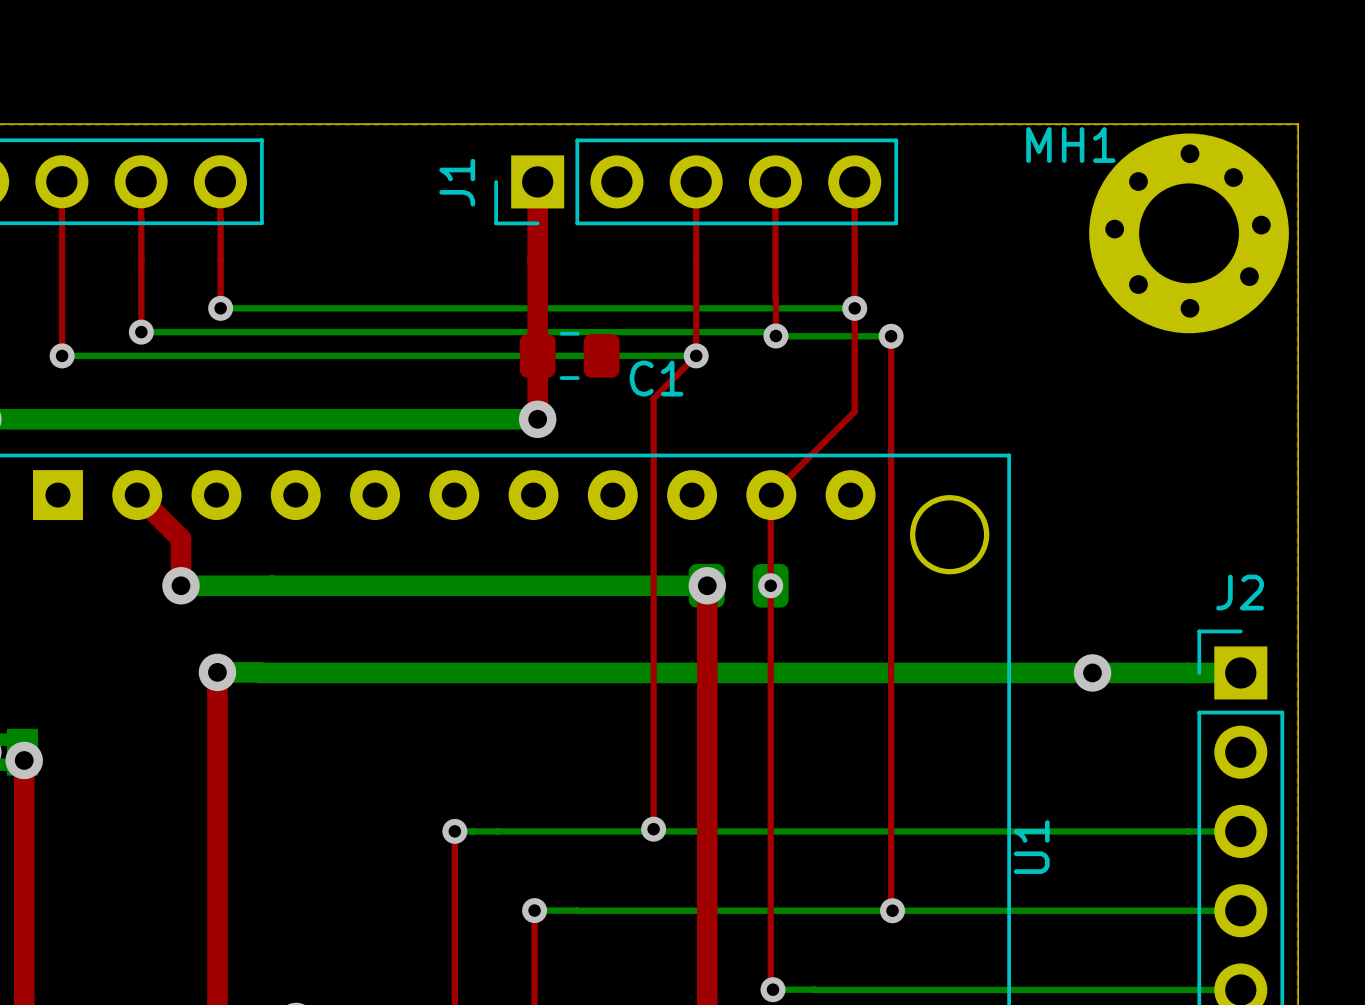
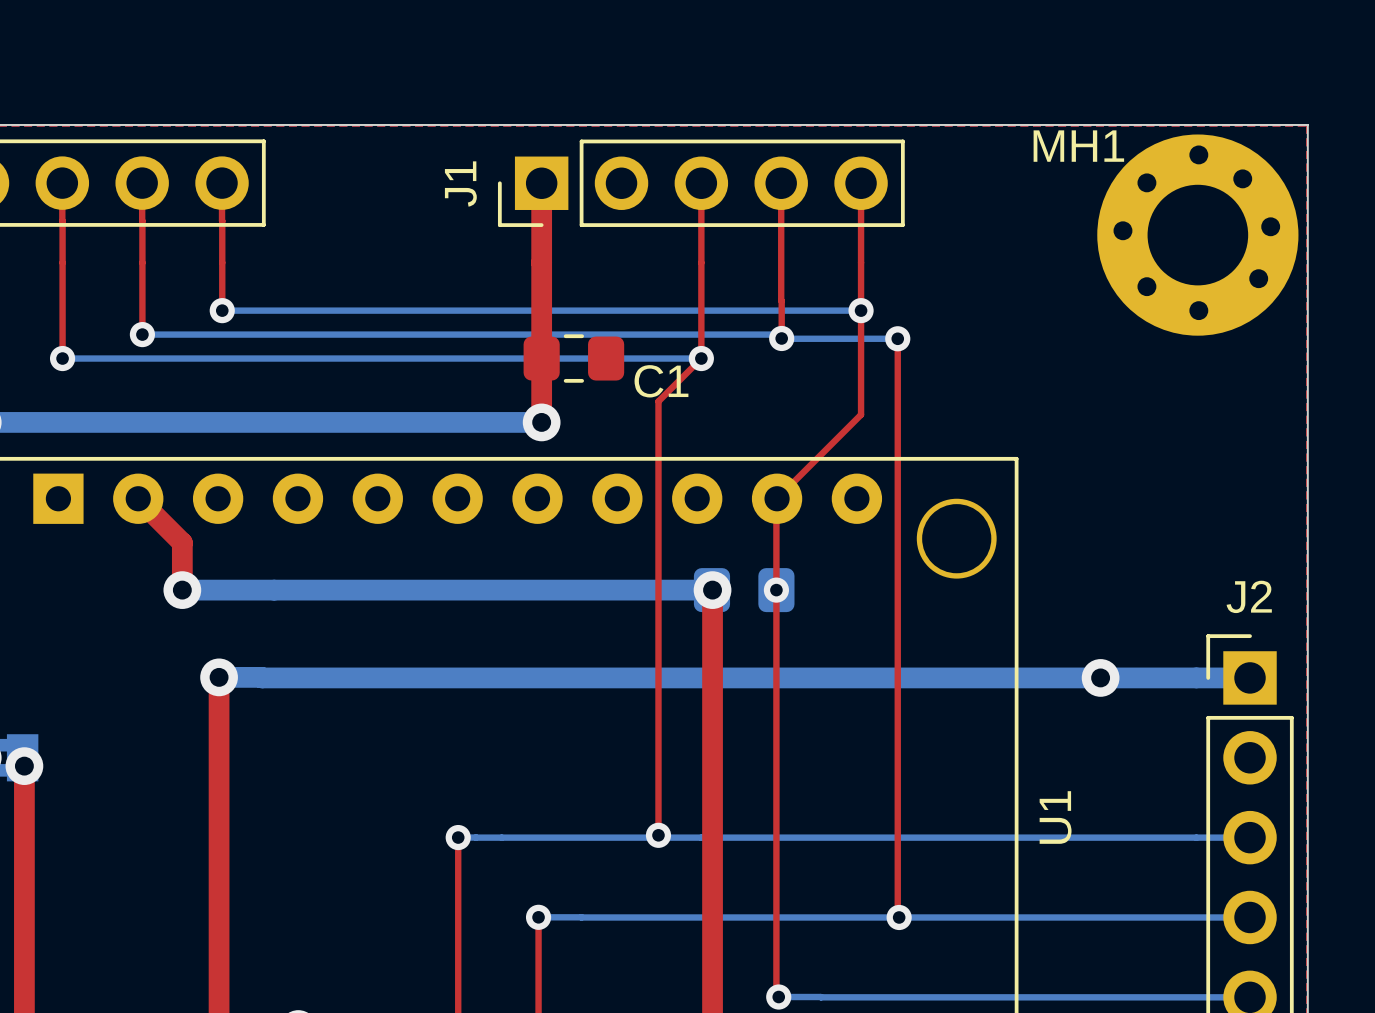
U1 name position: U1 (1031, 847) -> U1 (1055, 817)

